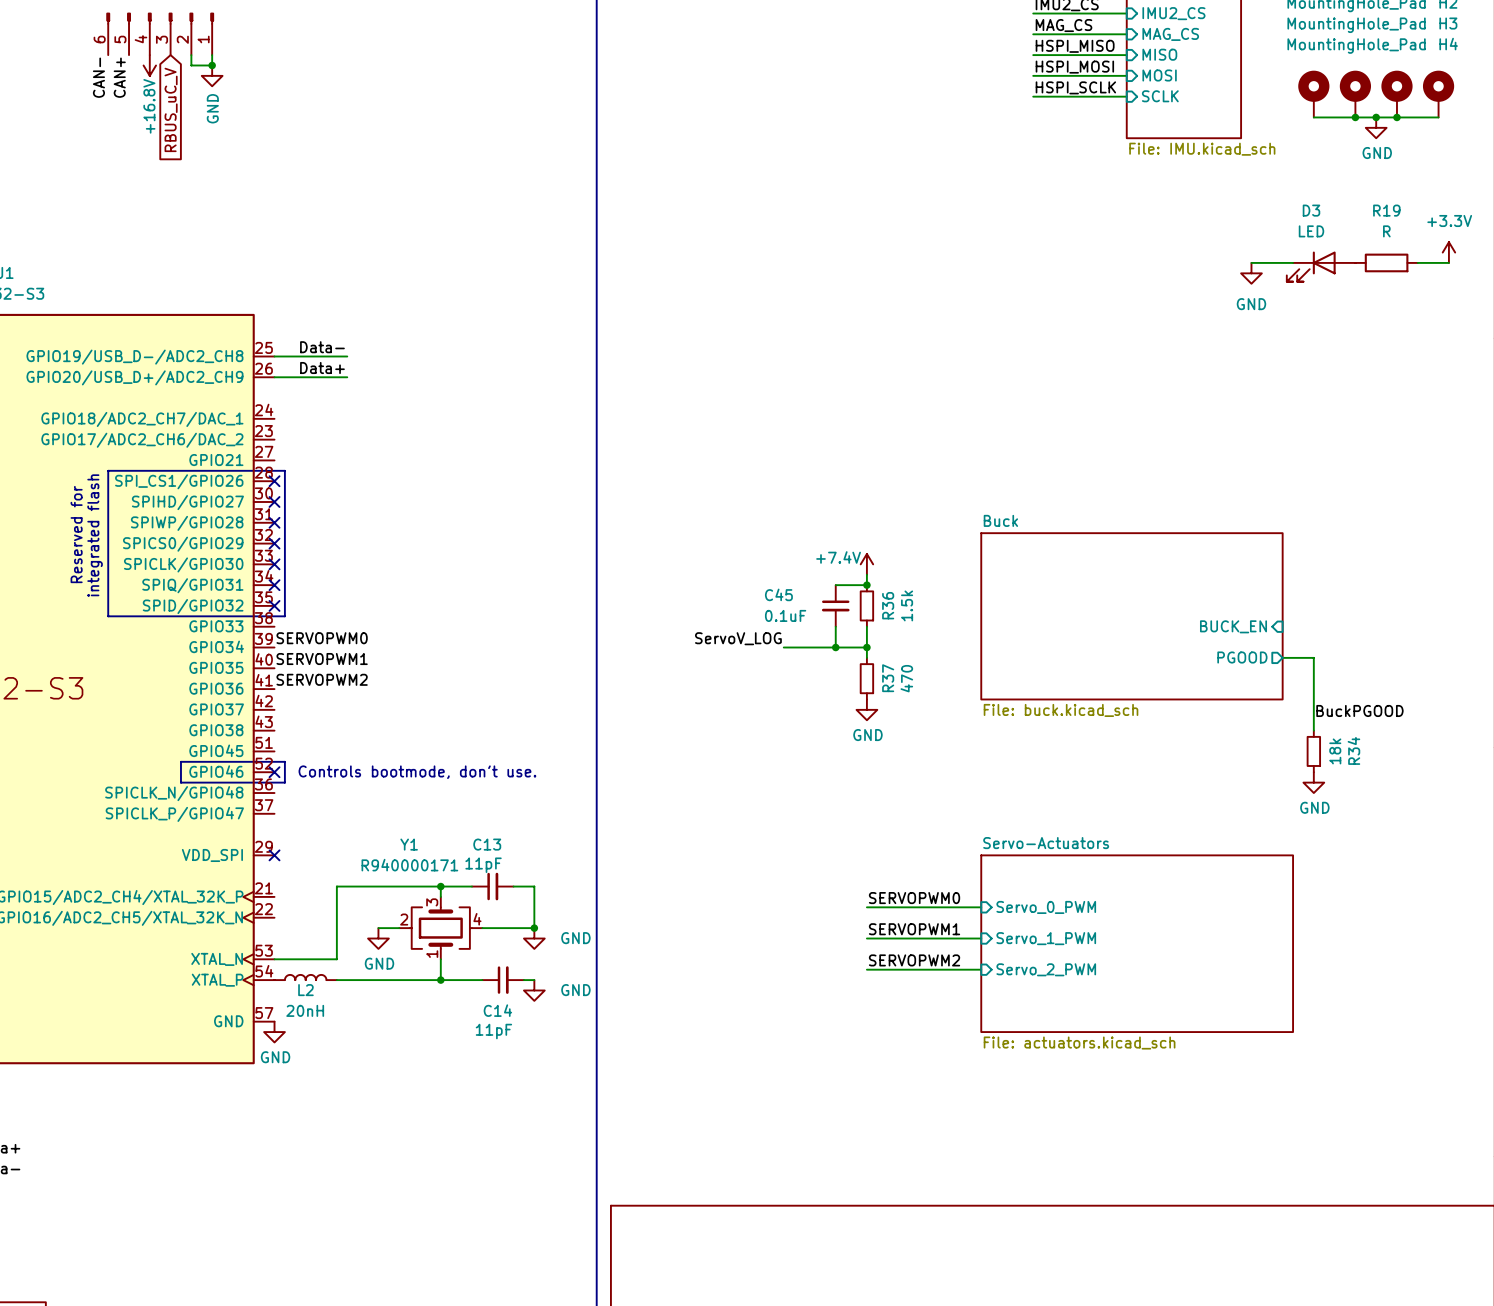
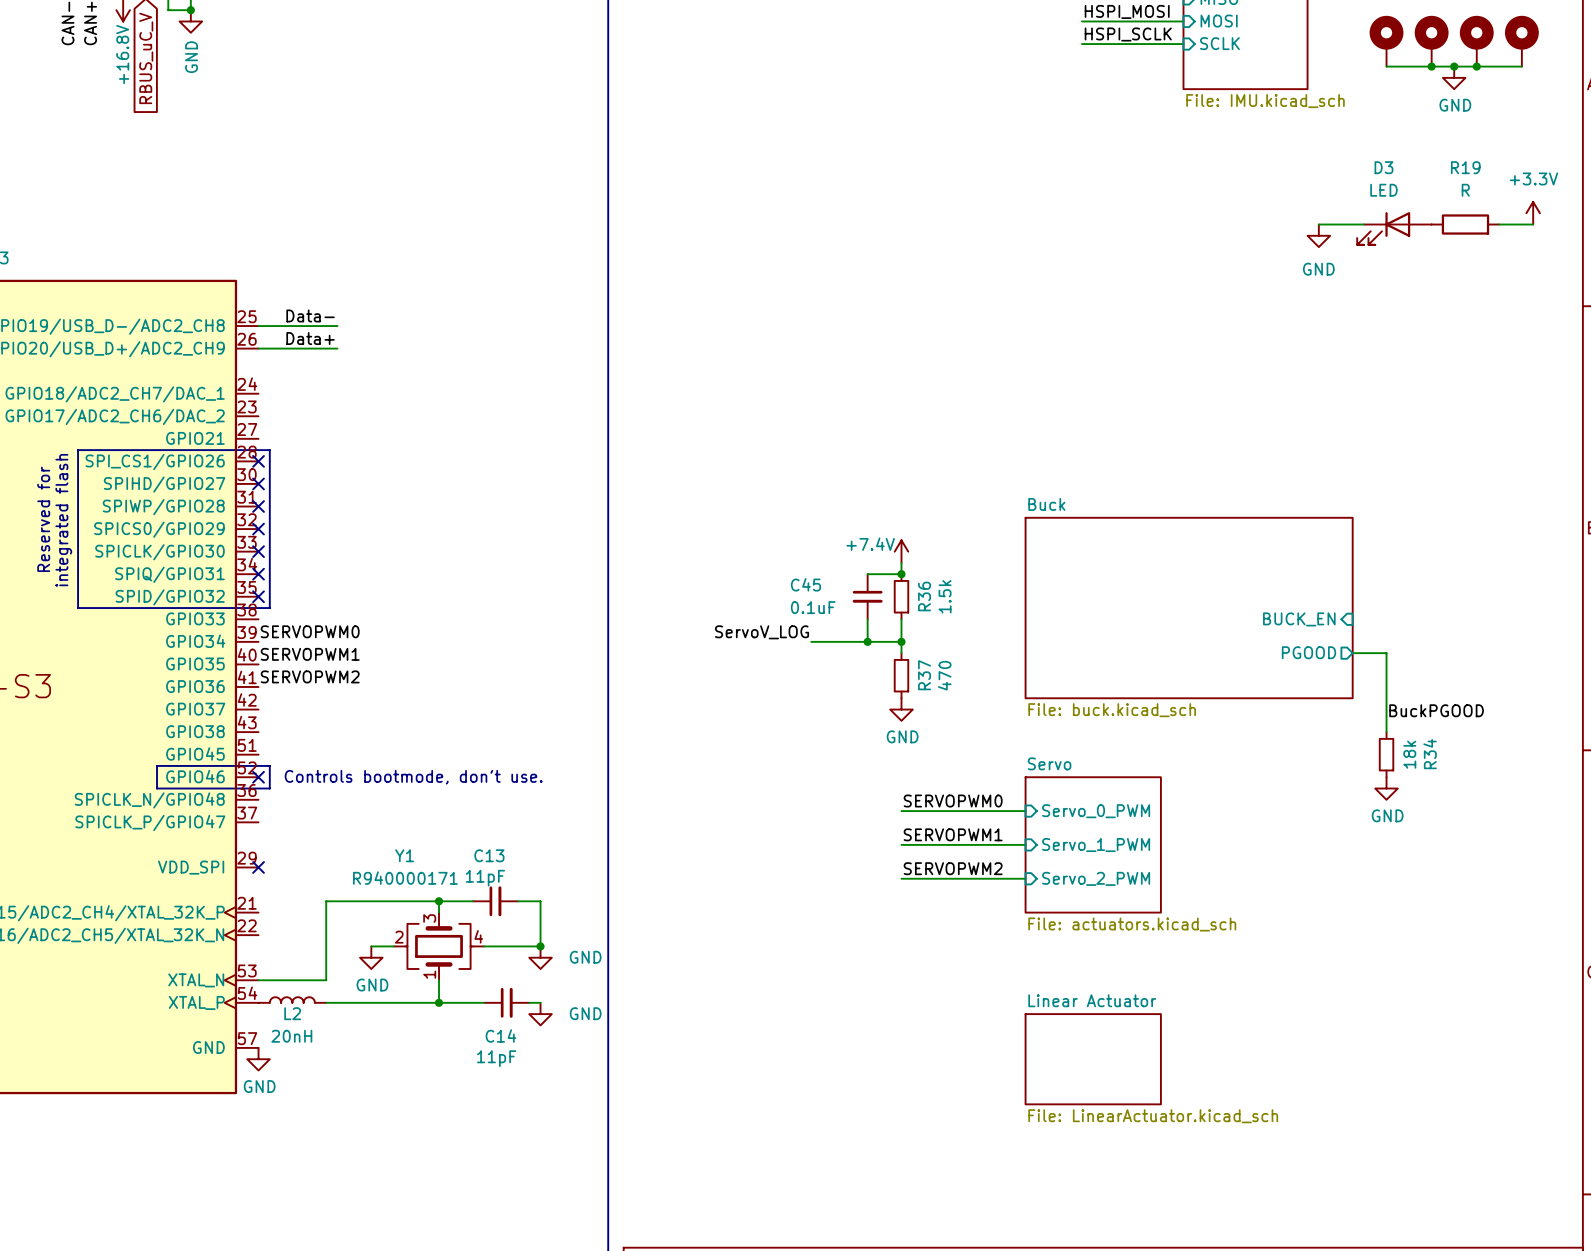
sheet Servo: none -> File: actuators.kicad_sch (1093, 844)
label position: SERVOPWM0 (914, 898) -> SERVOPWM0 (953, 801)
wire: (866, 907) (981, 907) -> (901, 878) (1025, 878)
sheet pin position: Servo_0_PWM (1046, 907) -> Servo_0_PWM (1096, 811)
label position: SERVOPWM1 (914, 929) -> SERVOPWM1 (953, 834)
wire: (866, 938) (981, 938) -> (901, 844) (1025, 844)
sheet pin position: Servo_1_PWM (1046, 938) -> Servo_1_PWM (1096, 845)
sheet Servo-Actuators: File: actuators.kicad_sch (1137, 943) -> none
label position: SERVOPWM2 (914, 960) -> SERVOPWM2 (953, 868)
wire: (866, 969) (981, 969) -> (901, 811) (1025, 811)
sheet pin position: Servo_2_PWM (1046, 969) -> Servo_2_PWM (1096, 878)
sheet Linear Actuator: none -> File: LinearActuator.kicad_sch (1093, 1059)

